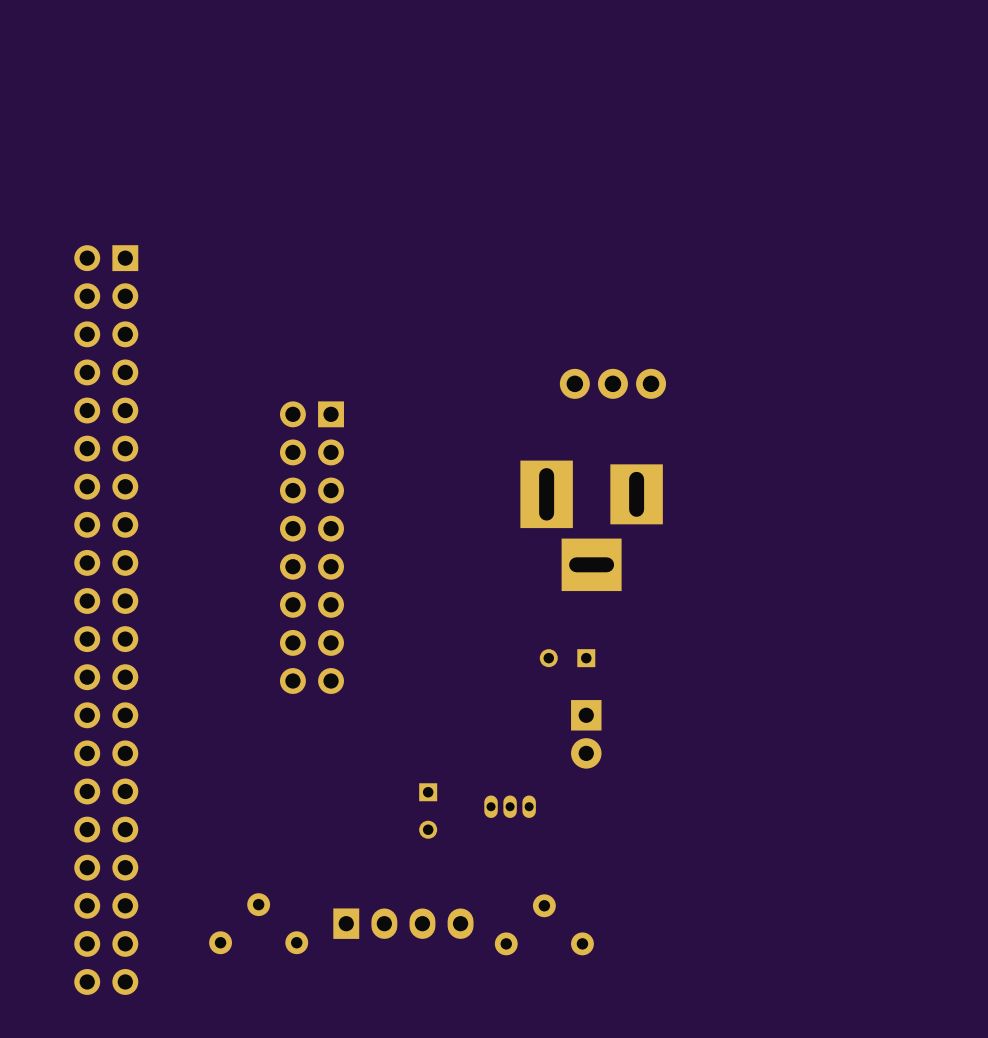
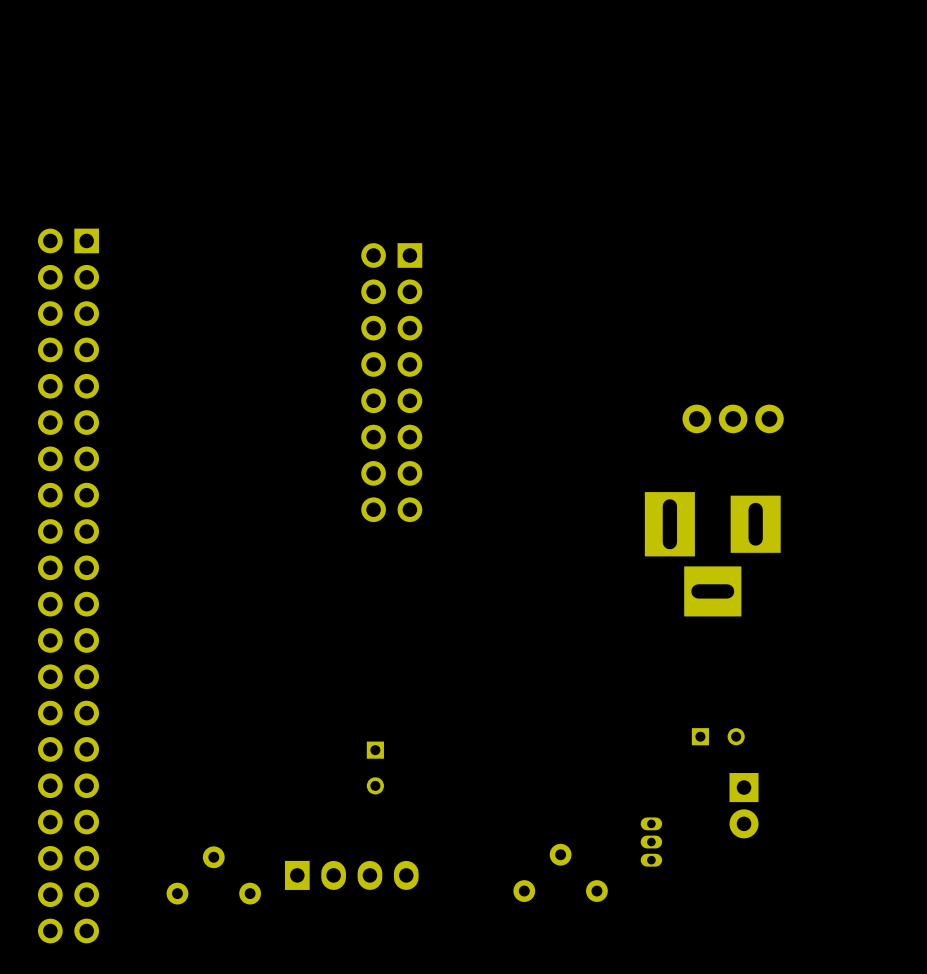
part position: (612, 383) -> (733, 418)
part position: (591, 525) -> (712, 554)
part position: (311, 547) -> (391, 382)
part rotation: 0° (567, 658) -> 180° (718, 736)
part position: (567, 658) -> (718, 736)
part position: (586, 734) -> (744, 805)
part rotation: 0° (510, 806) -> 90° clockwise (651, 842)
part position: (510, 806) -> (651, 842)
part position: (544, 924) -> (560, 872)

